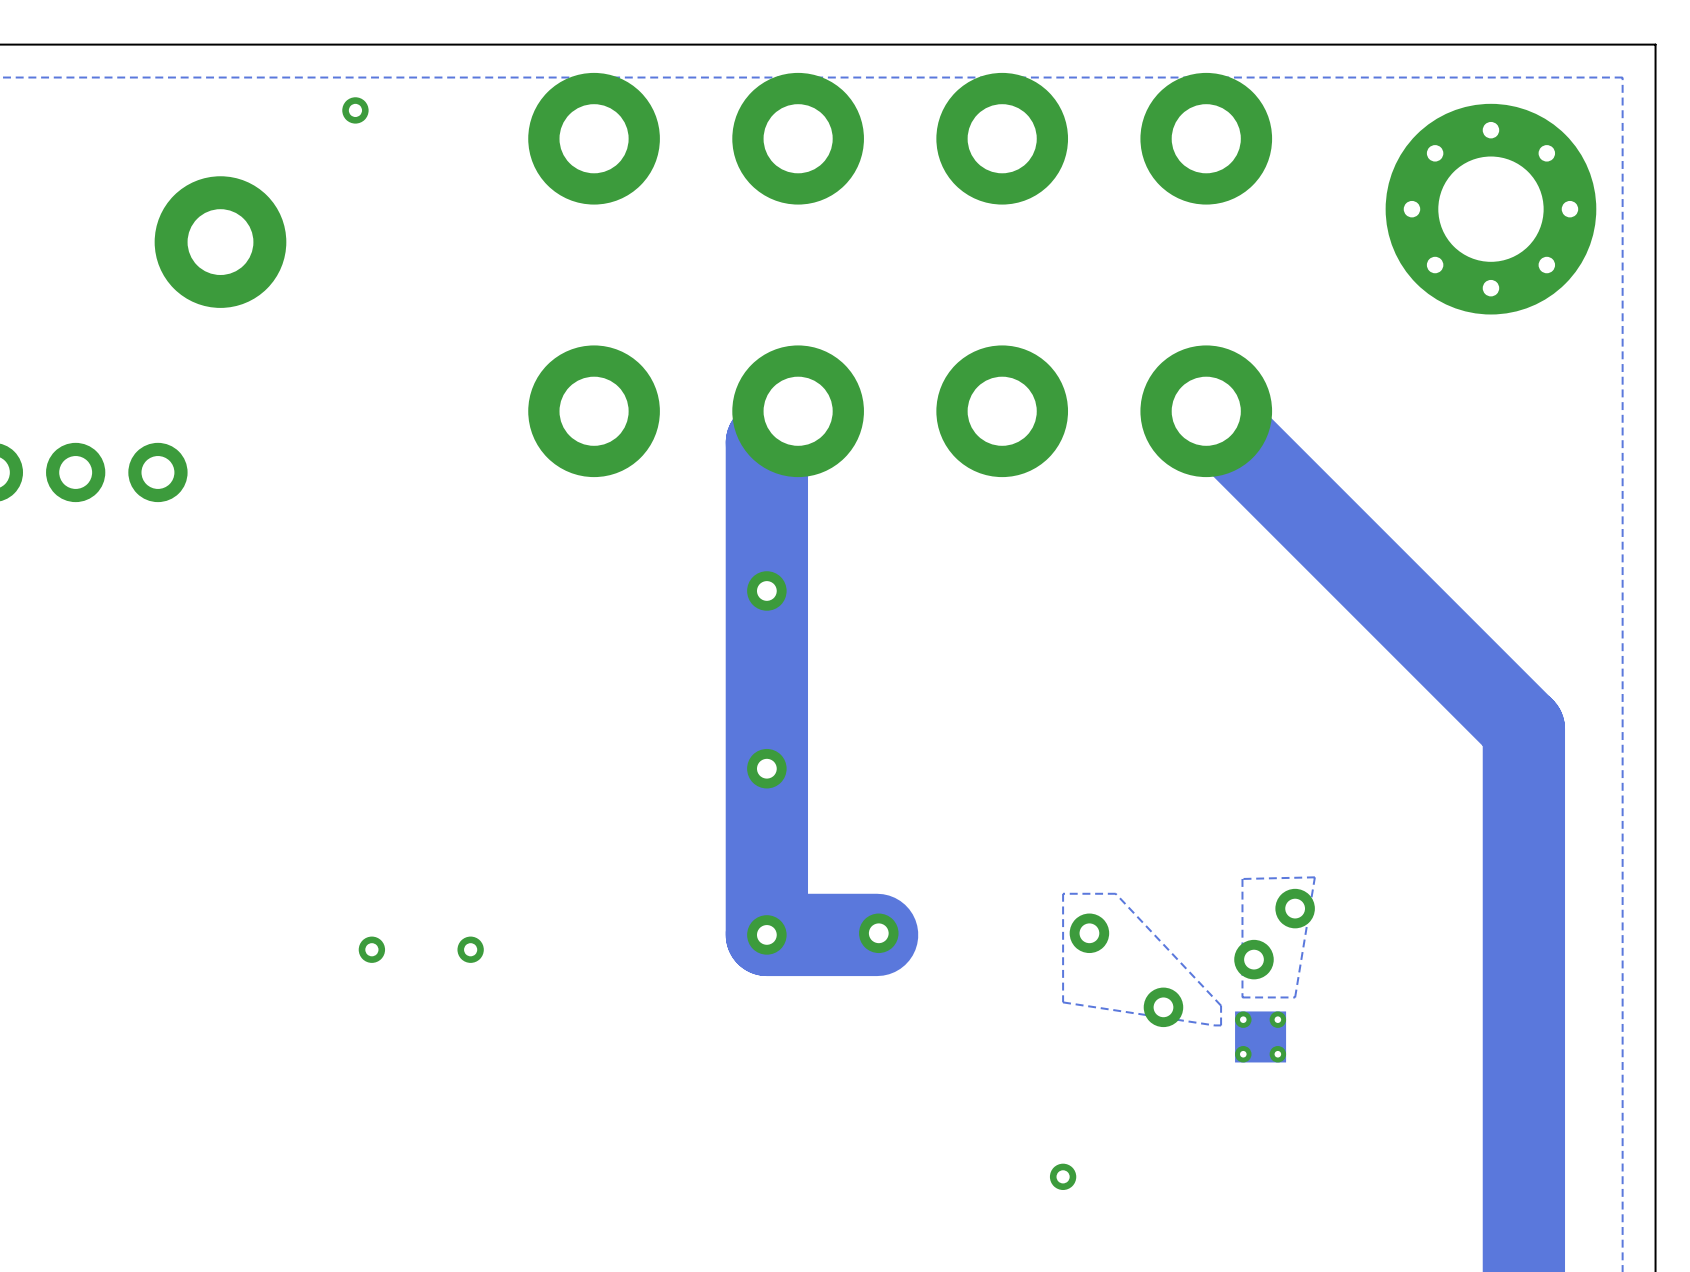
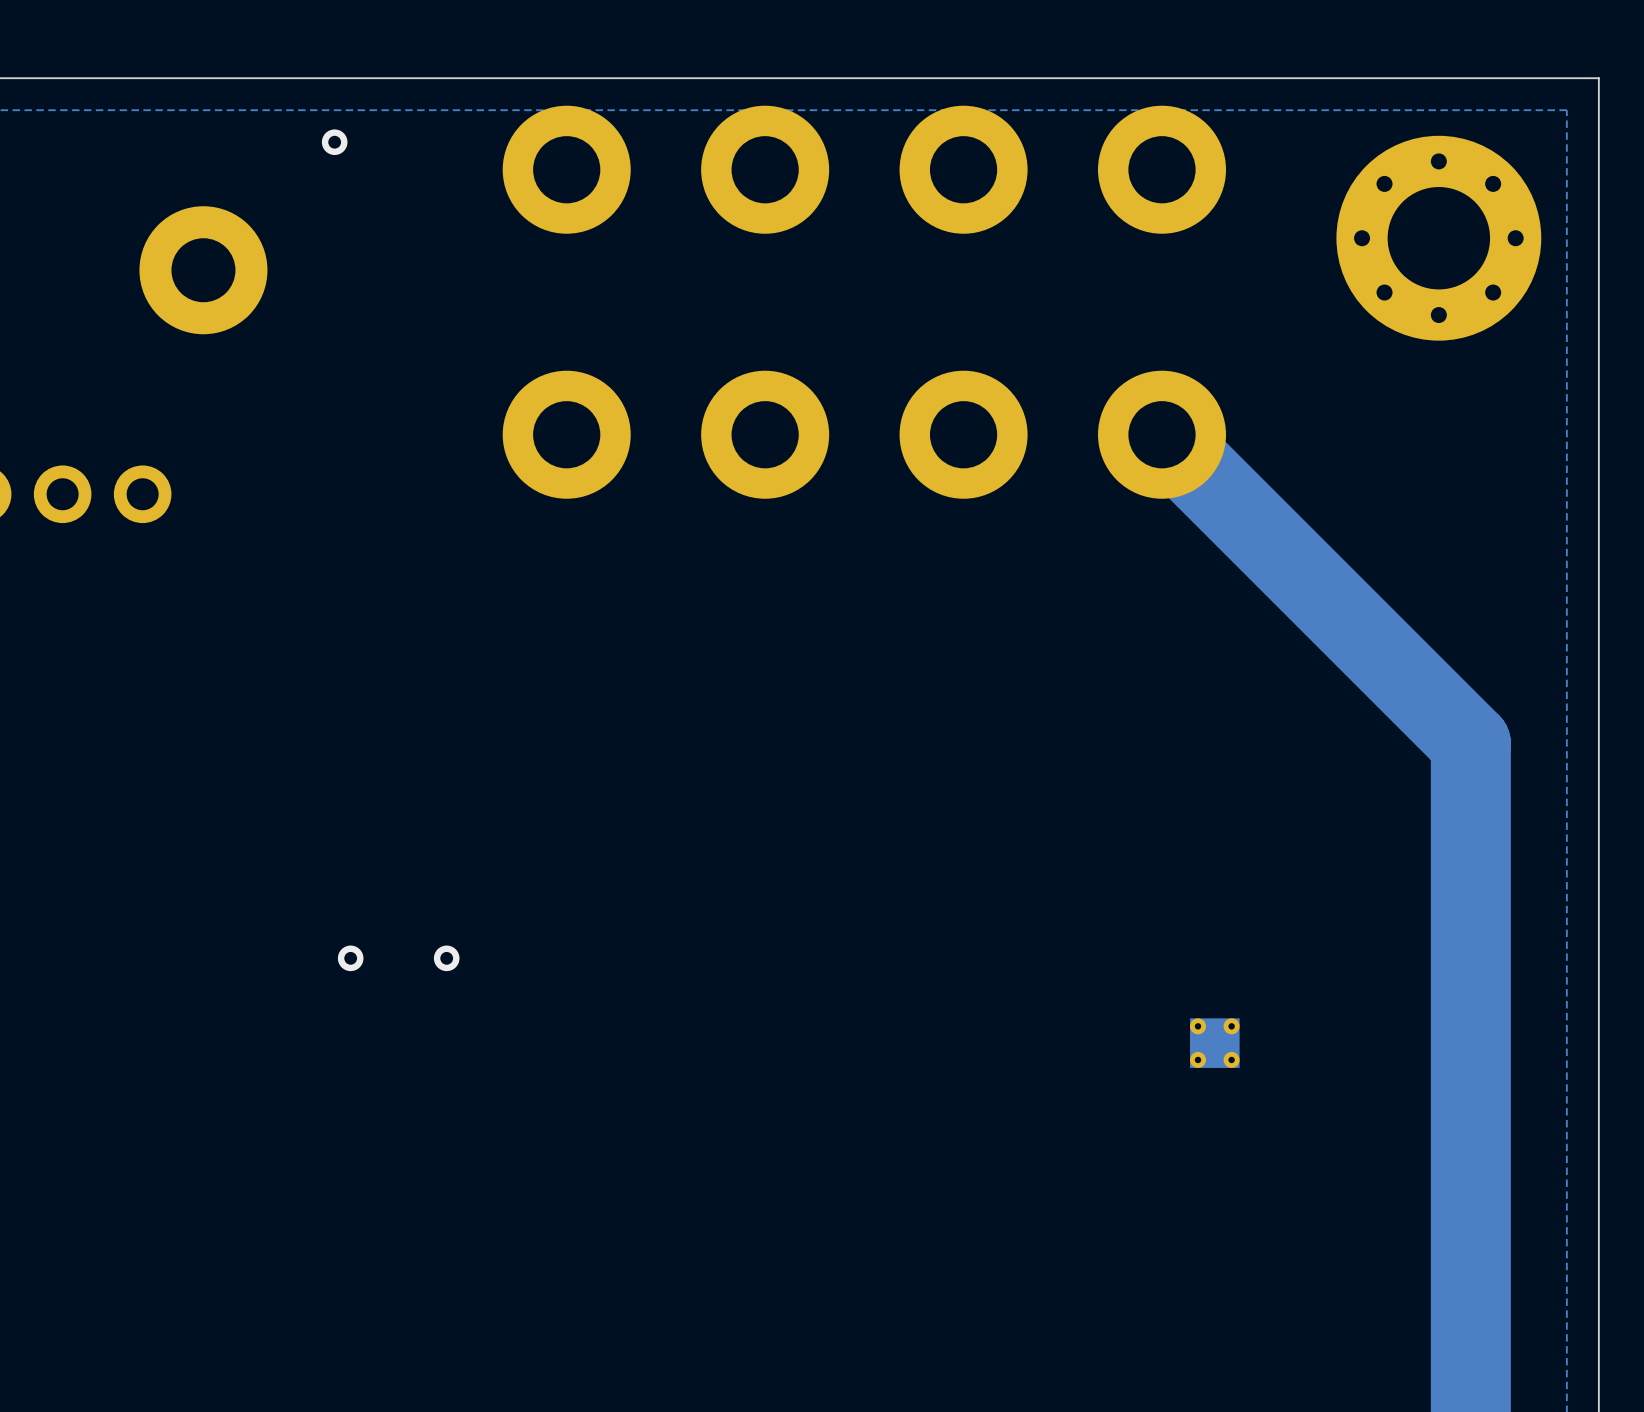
track: (798, 411) (766, 442) (766, 934) (877, 934) -> none
via: (766, 590) -> none
via: (766, 768) -> none
zone outline: (1314, 877) (1295, 997) (1242, 997) (1242, 878) (1314, 877) -> none
zone outline: (1115, 893) (1221, 1005) (1221, 1025) (1063, 1002) (1063, 893) (1115, 893) -> none
via: (1295, 908) -> none
via: (878, 933) -> none
via: (1089, 933) -> none
via: (766, 934) -> none
via: (1253, 959) -> none
via: (1163, 1007) -> none
via: (1063, 1176) -> none

